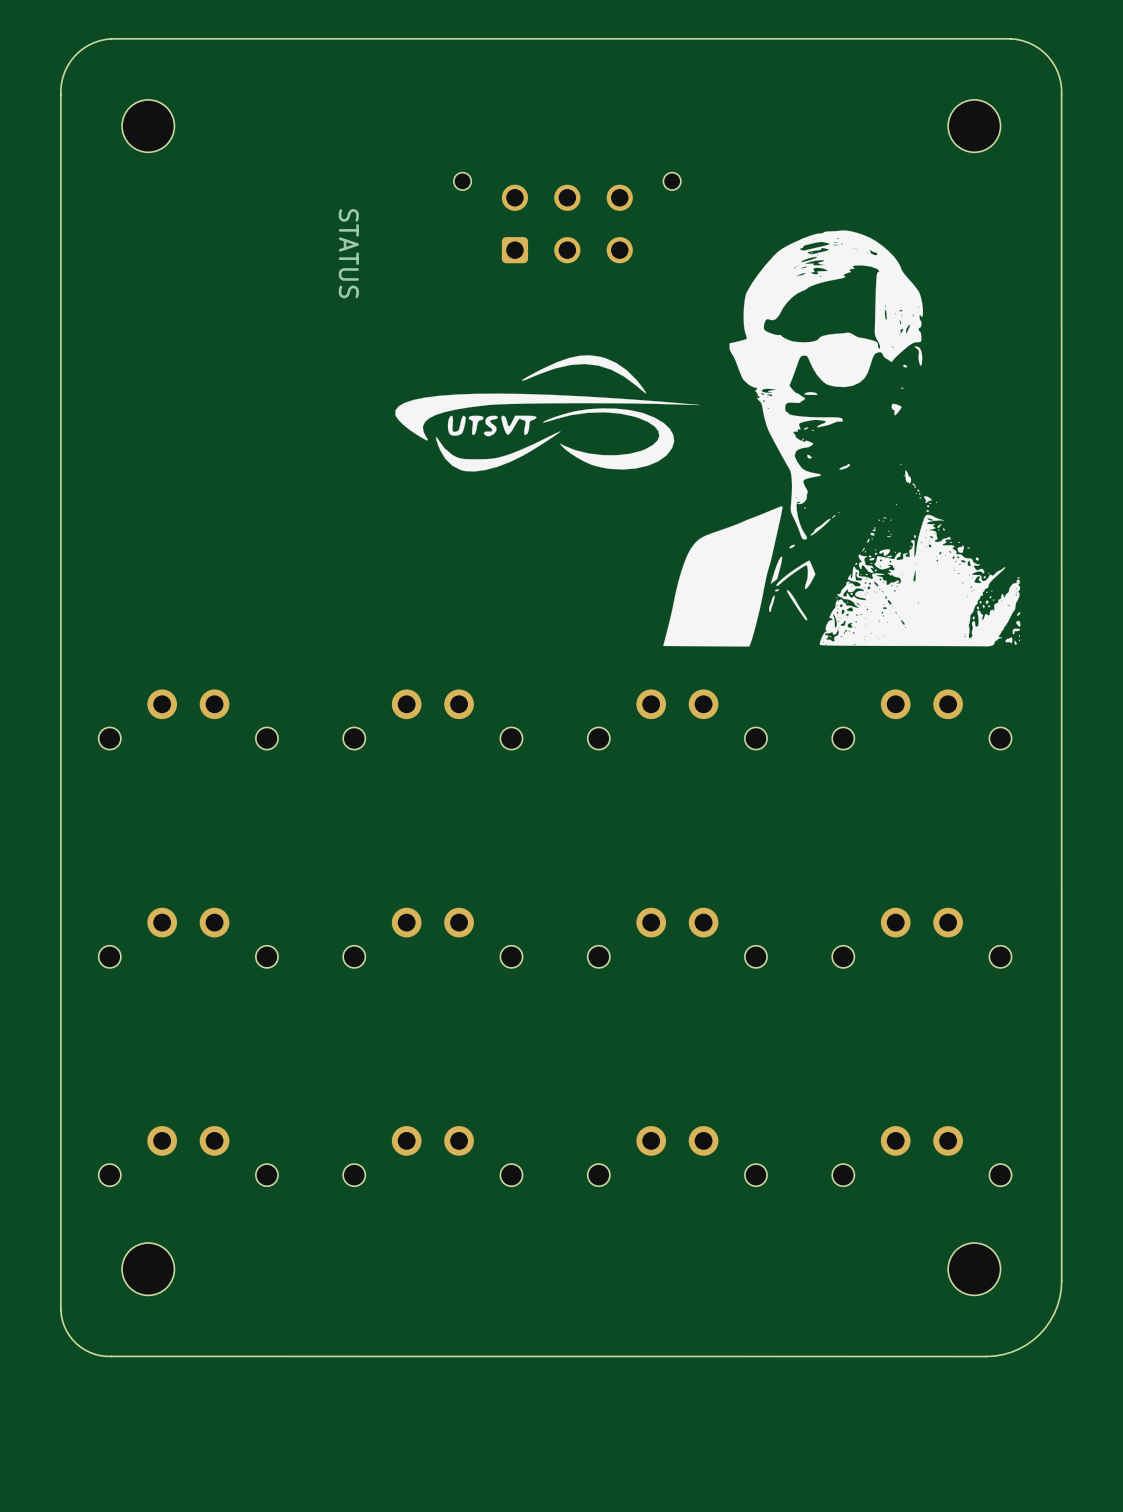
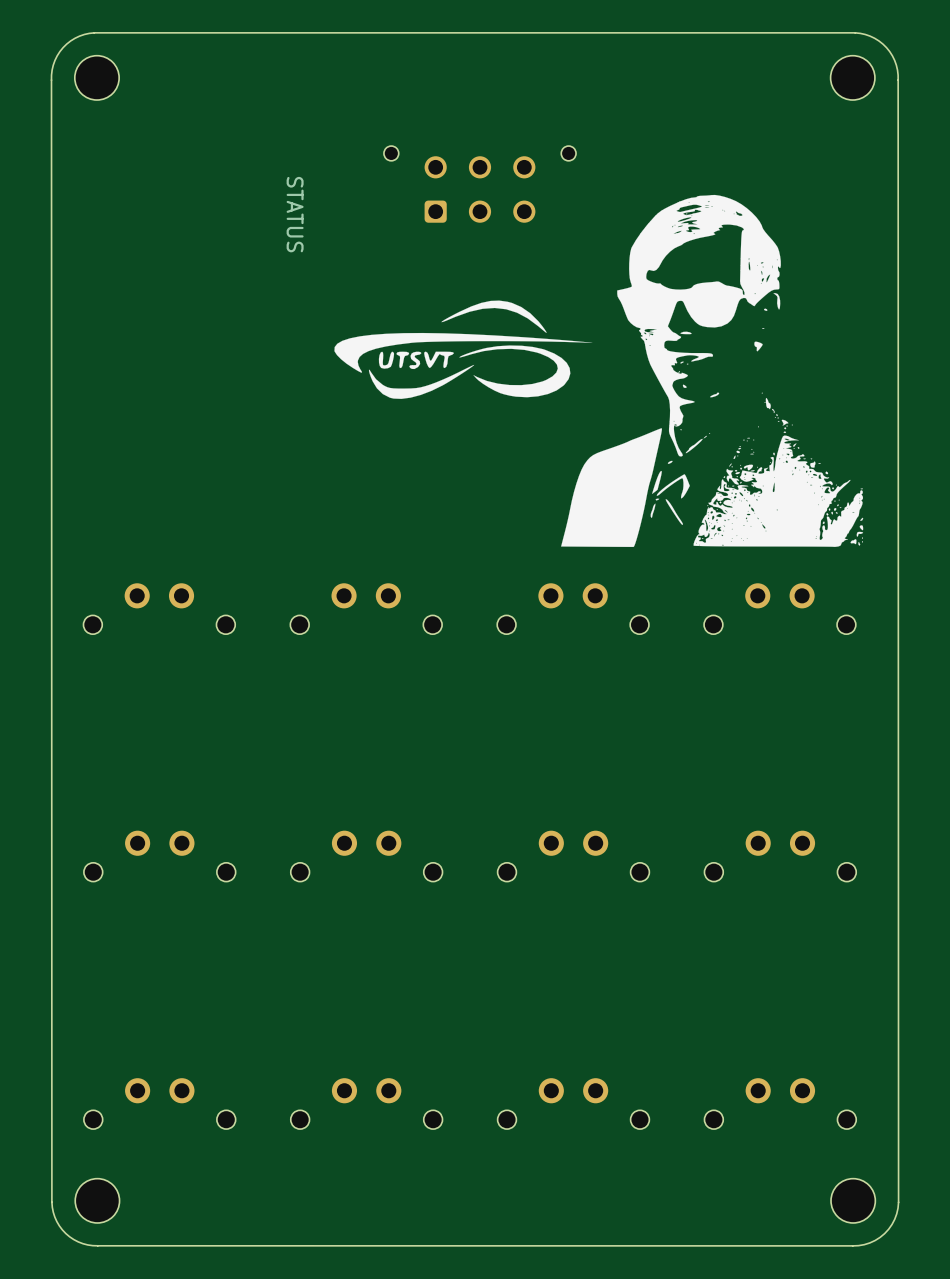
board edge: (1061, 94) (1061, 1289) (1054, 1313) (1039, 1334) (1026, 1344) (1011, 1352) (986, 1356) (106, 1356) (85, 1350) (69, 1335) (62, 1321) (60, 1310) (60, 94) -> (898, 80) (898, 1202) (894, 1219) (884, 1233) (869, 1242) (852, 1245) (97, 1245) (82, 1243) (73, 1239) (59, 1225) (53, 1212) (51, 1202) (51, 80)
part position: (148, 126) -> (96, 77)
part position: (974, 126) -> (852, 77)
part: (188, 937) -> none
part: (432, 937) -> none
part: (677, 937) -> none
part: (921, 937) -> none
part: none -> (159, 856)
part: none -> (366, 856)
part: none -> (573, 856)
part: none -> (780, 856)
part: (188, 1156) -> none
part: (432, 1156) -> none
part: (677, 1156) -> none
part: (921, 1156) -> none
part position: (148, 1269) -> (97, 1200)
part position: (974, 1269) -> (853, 1200)
part: none -> (159, 1103)
part: none -> (366, 1103)
part: none -> (573, 1103)
part: none -> (780, 1103)

